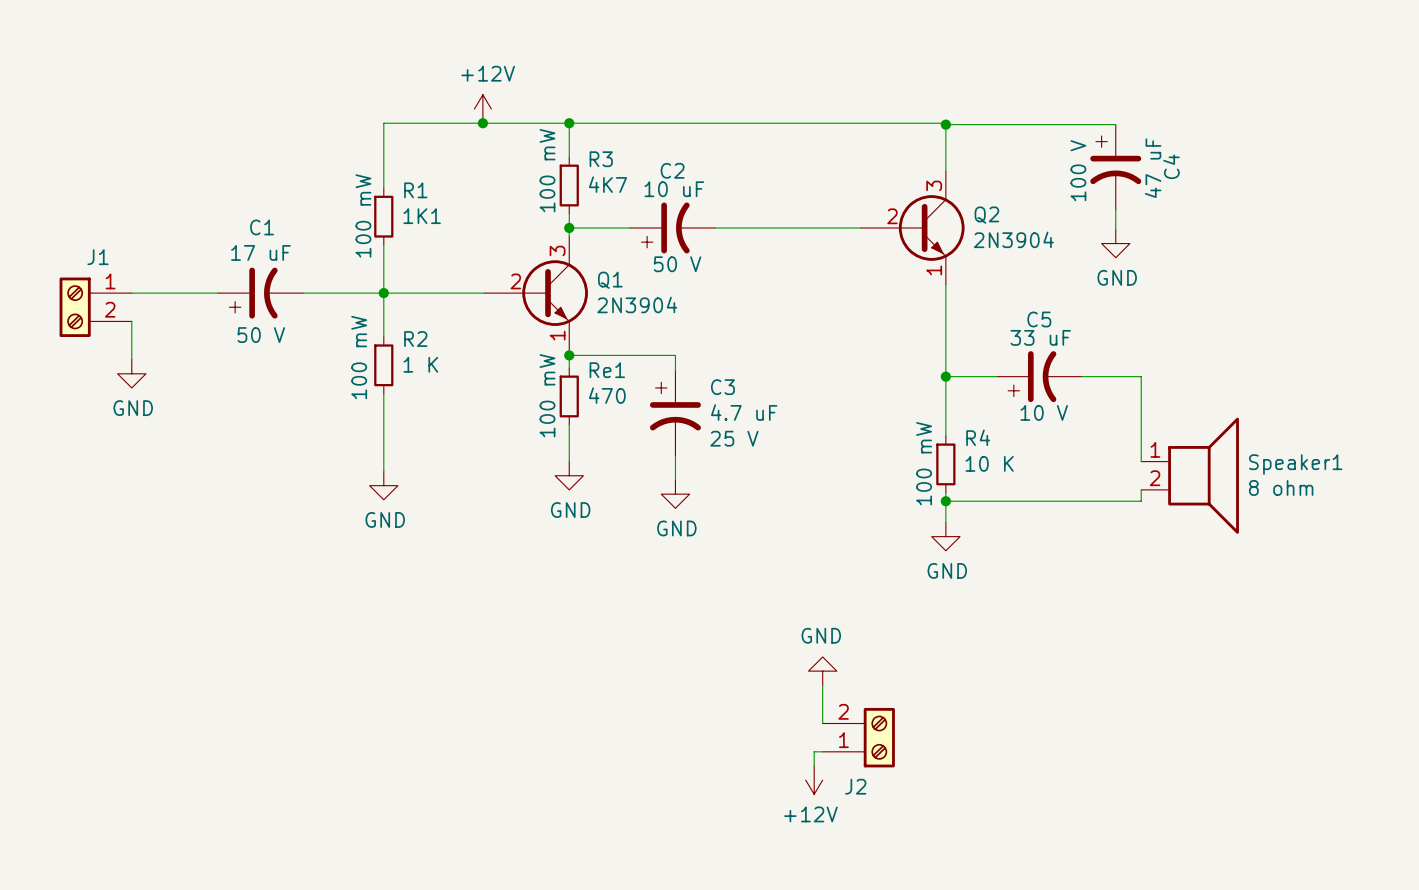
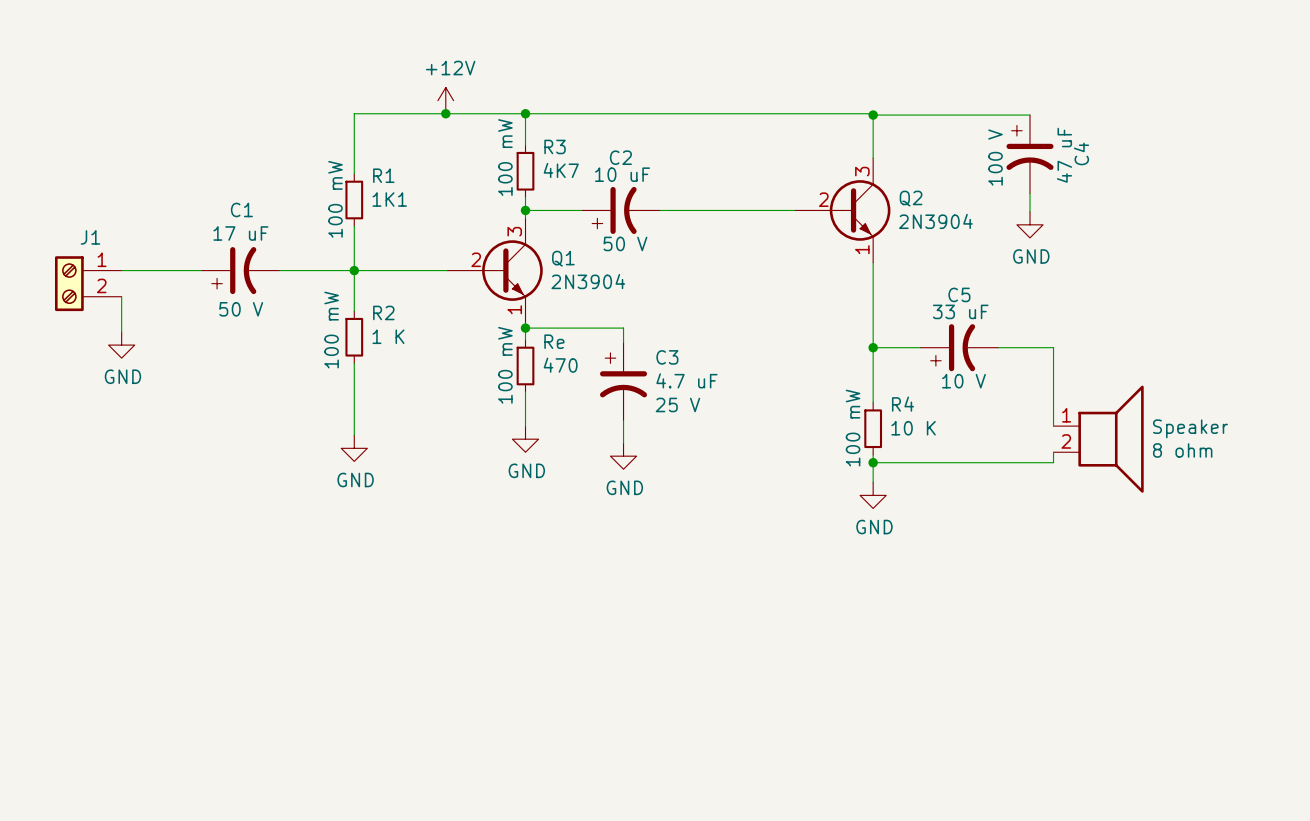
Re1 name: Re1 (607, 370) -> Re (554, 341)
Speaker1 name: Speaker1 (1295, 464) -> Speaker (1190, 428)
power symbol: GND (822, 671) -> none
wire: (822, 685) (822, 723) -> none
J2: (858, 737) -> none
wire: (822, 751) (814, 751) (814, 765) -> none
power symbol: +12V (814, 780) -> none

